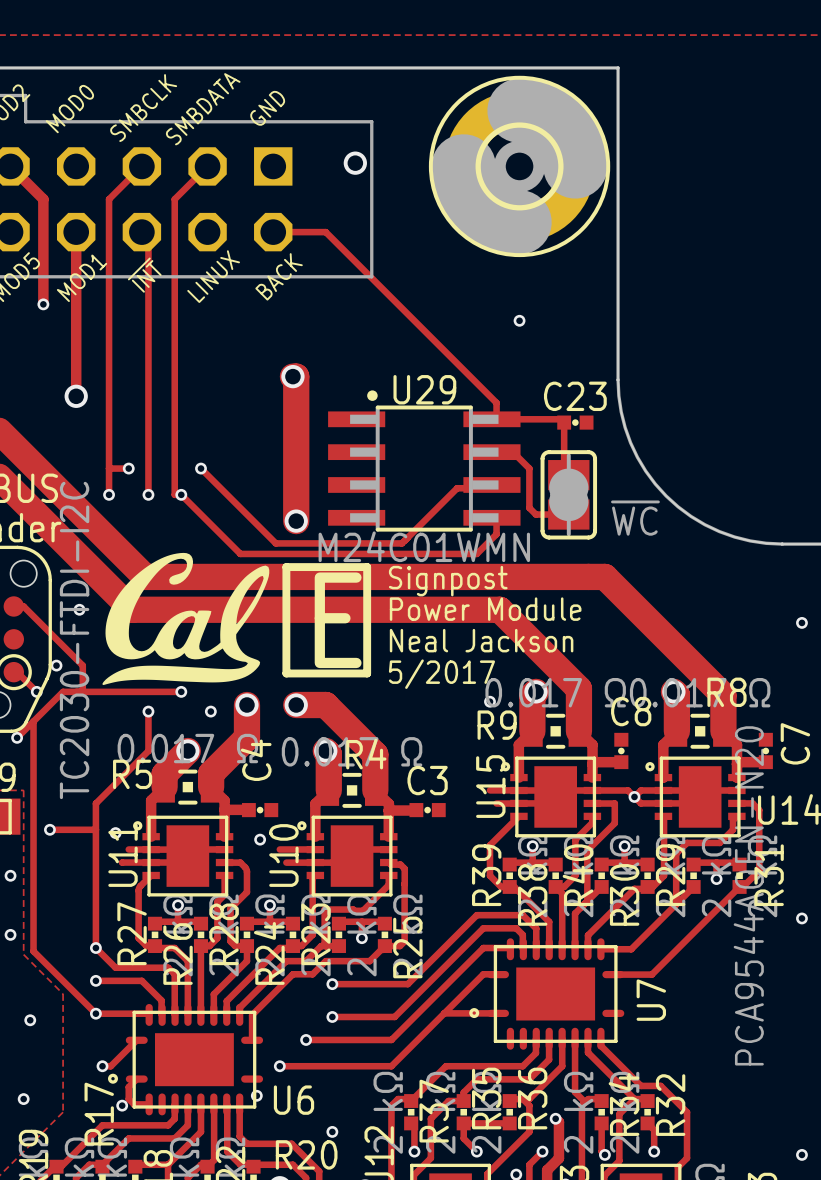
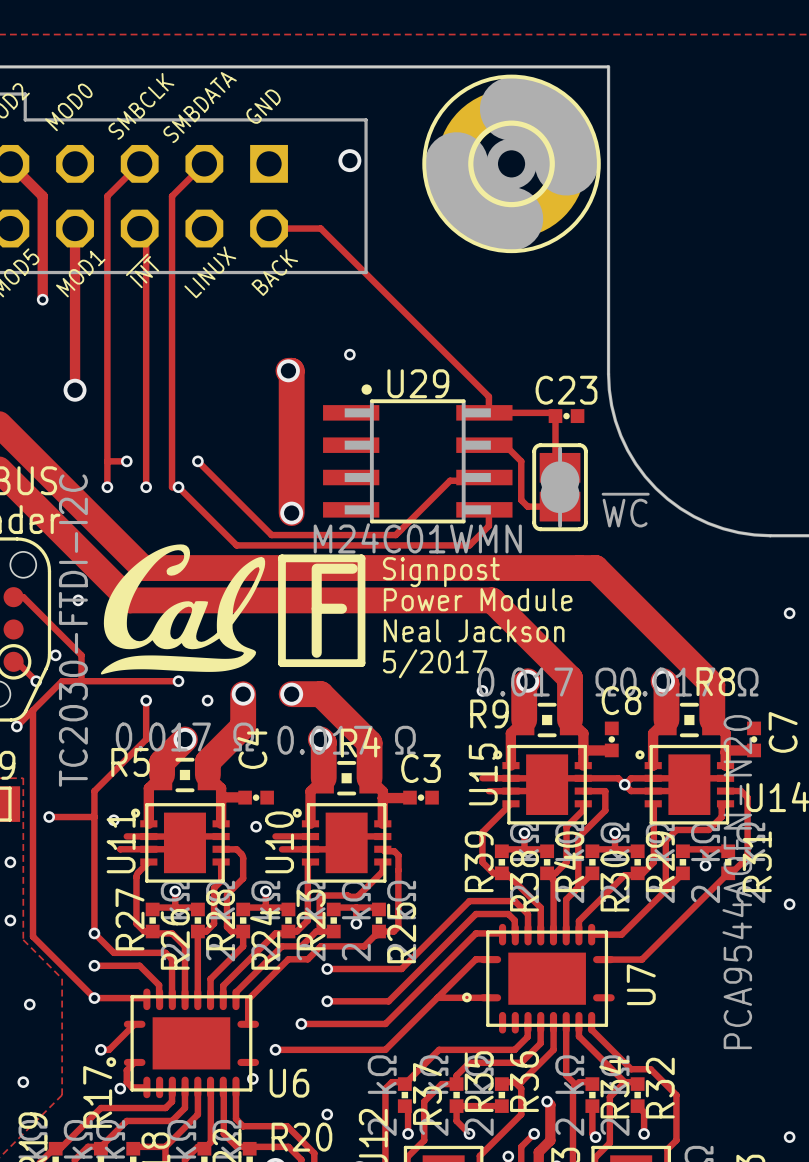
via: (519, 320) -> none
via: none -> (349, 354)
text: E (338, 620) -> F (334, 610)

